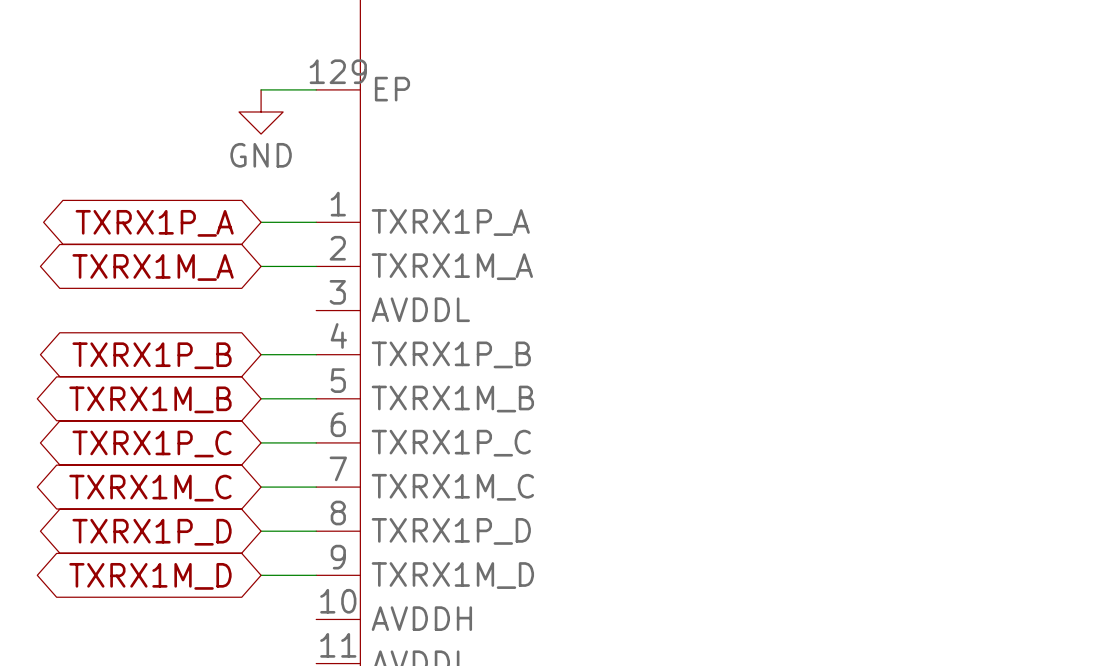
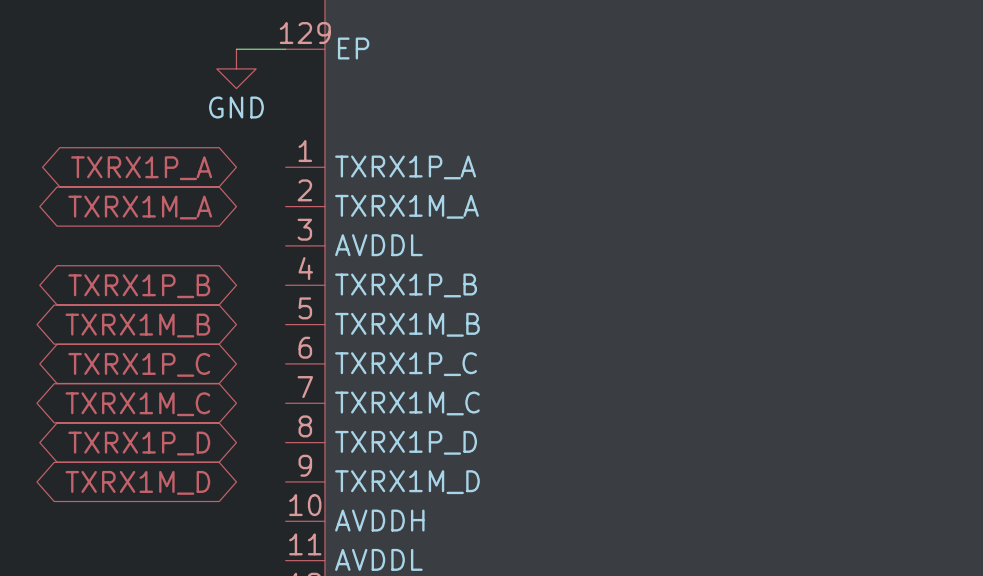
wire: (261, 222) (316, 222) -> none
wire: (261, 266) (316, 266) -> none
wire: (261, 354) (316, 354) -> none
wire: (261, 398) (316, 398) -> none
wire: (261, 442) (316, 442) -> none
wire: (261, 487) (316, 487) -> none
wire: (261, 531) (316, 531) -> none
wire: (261, 575) (316, 575) -> none

